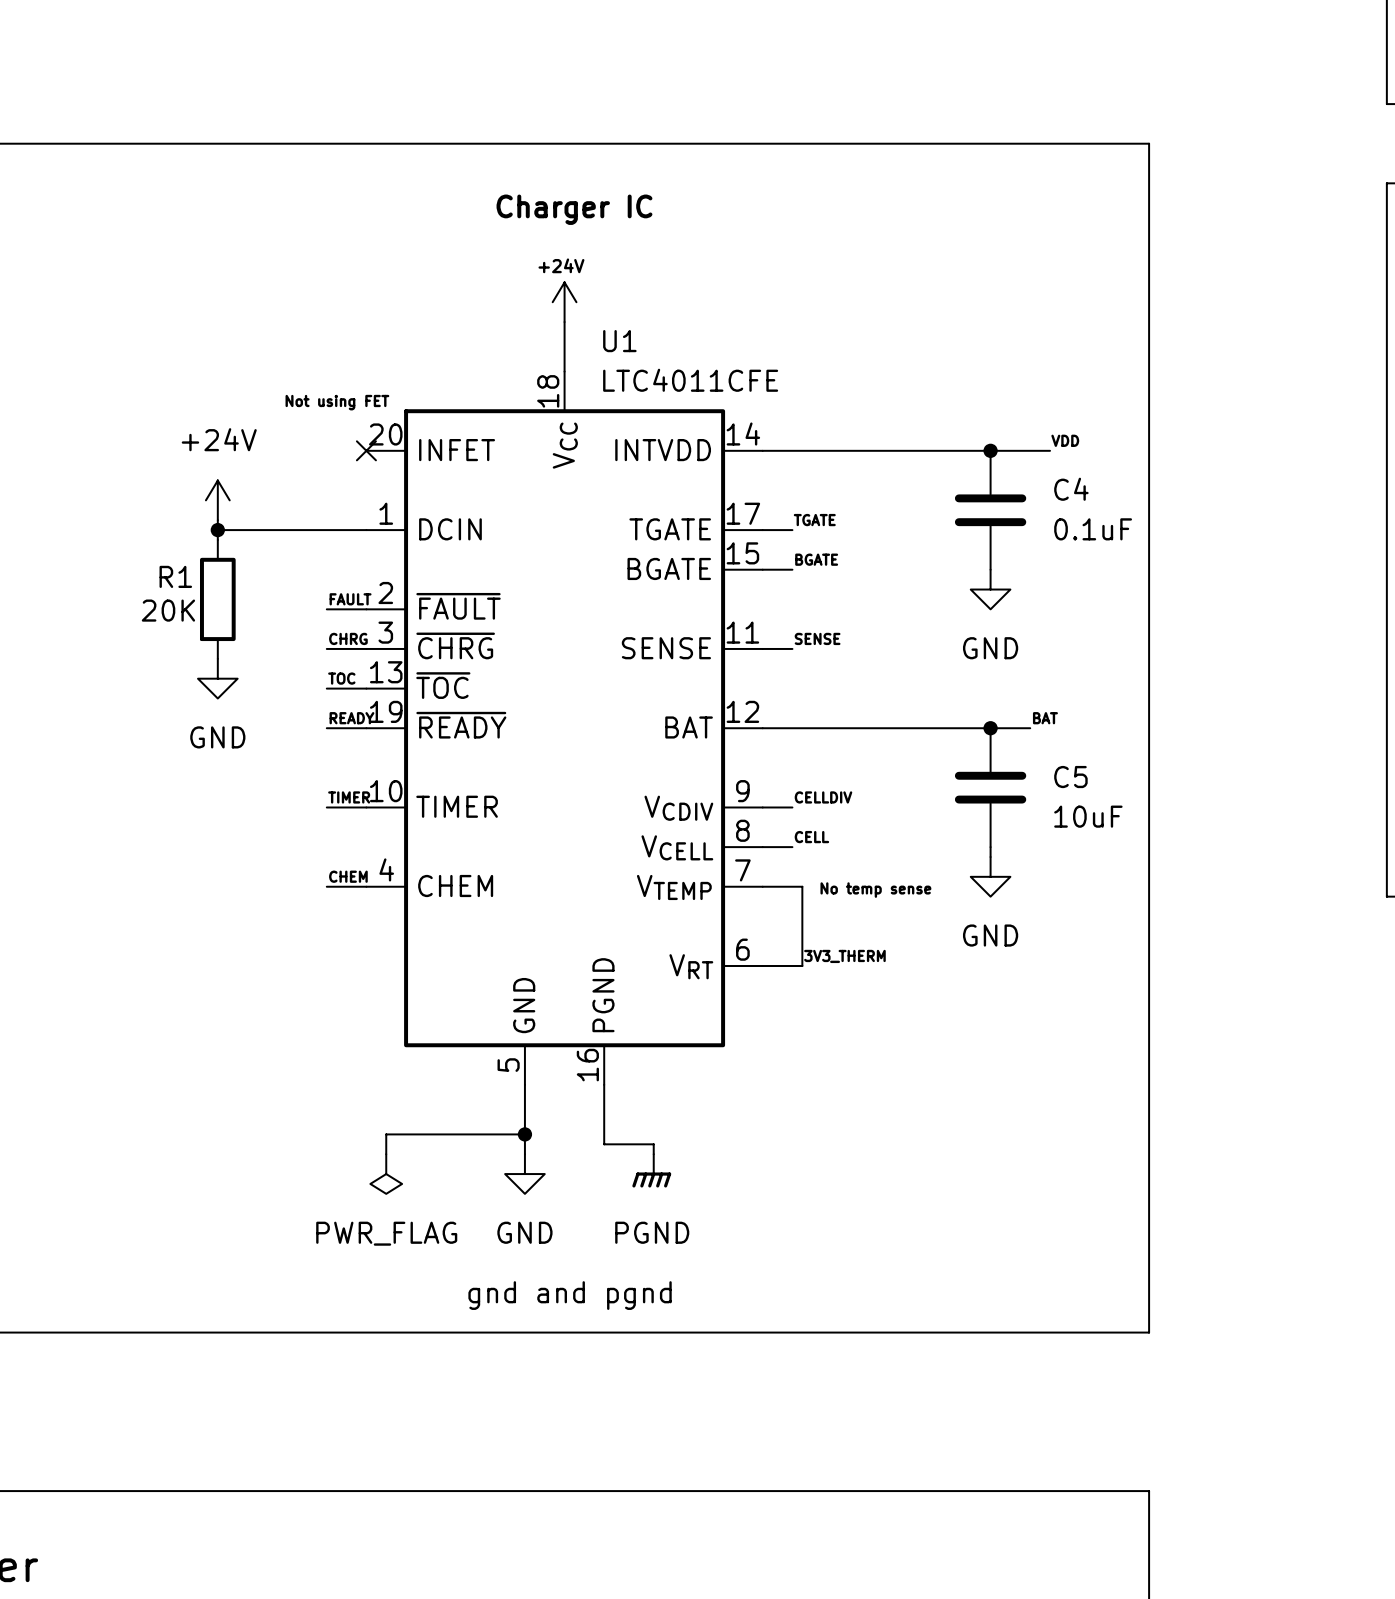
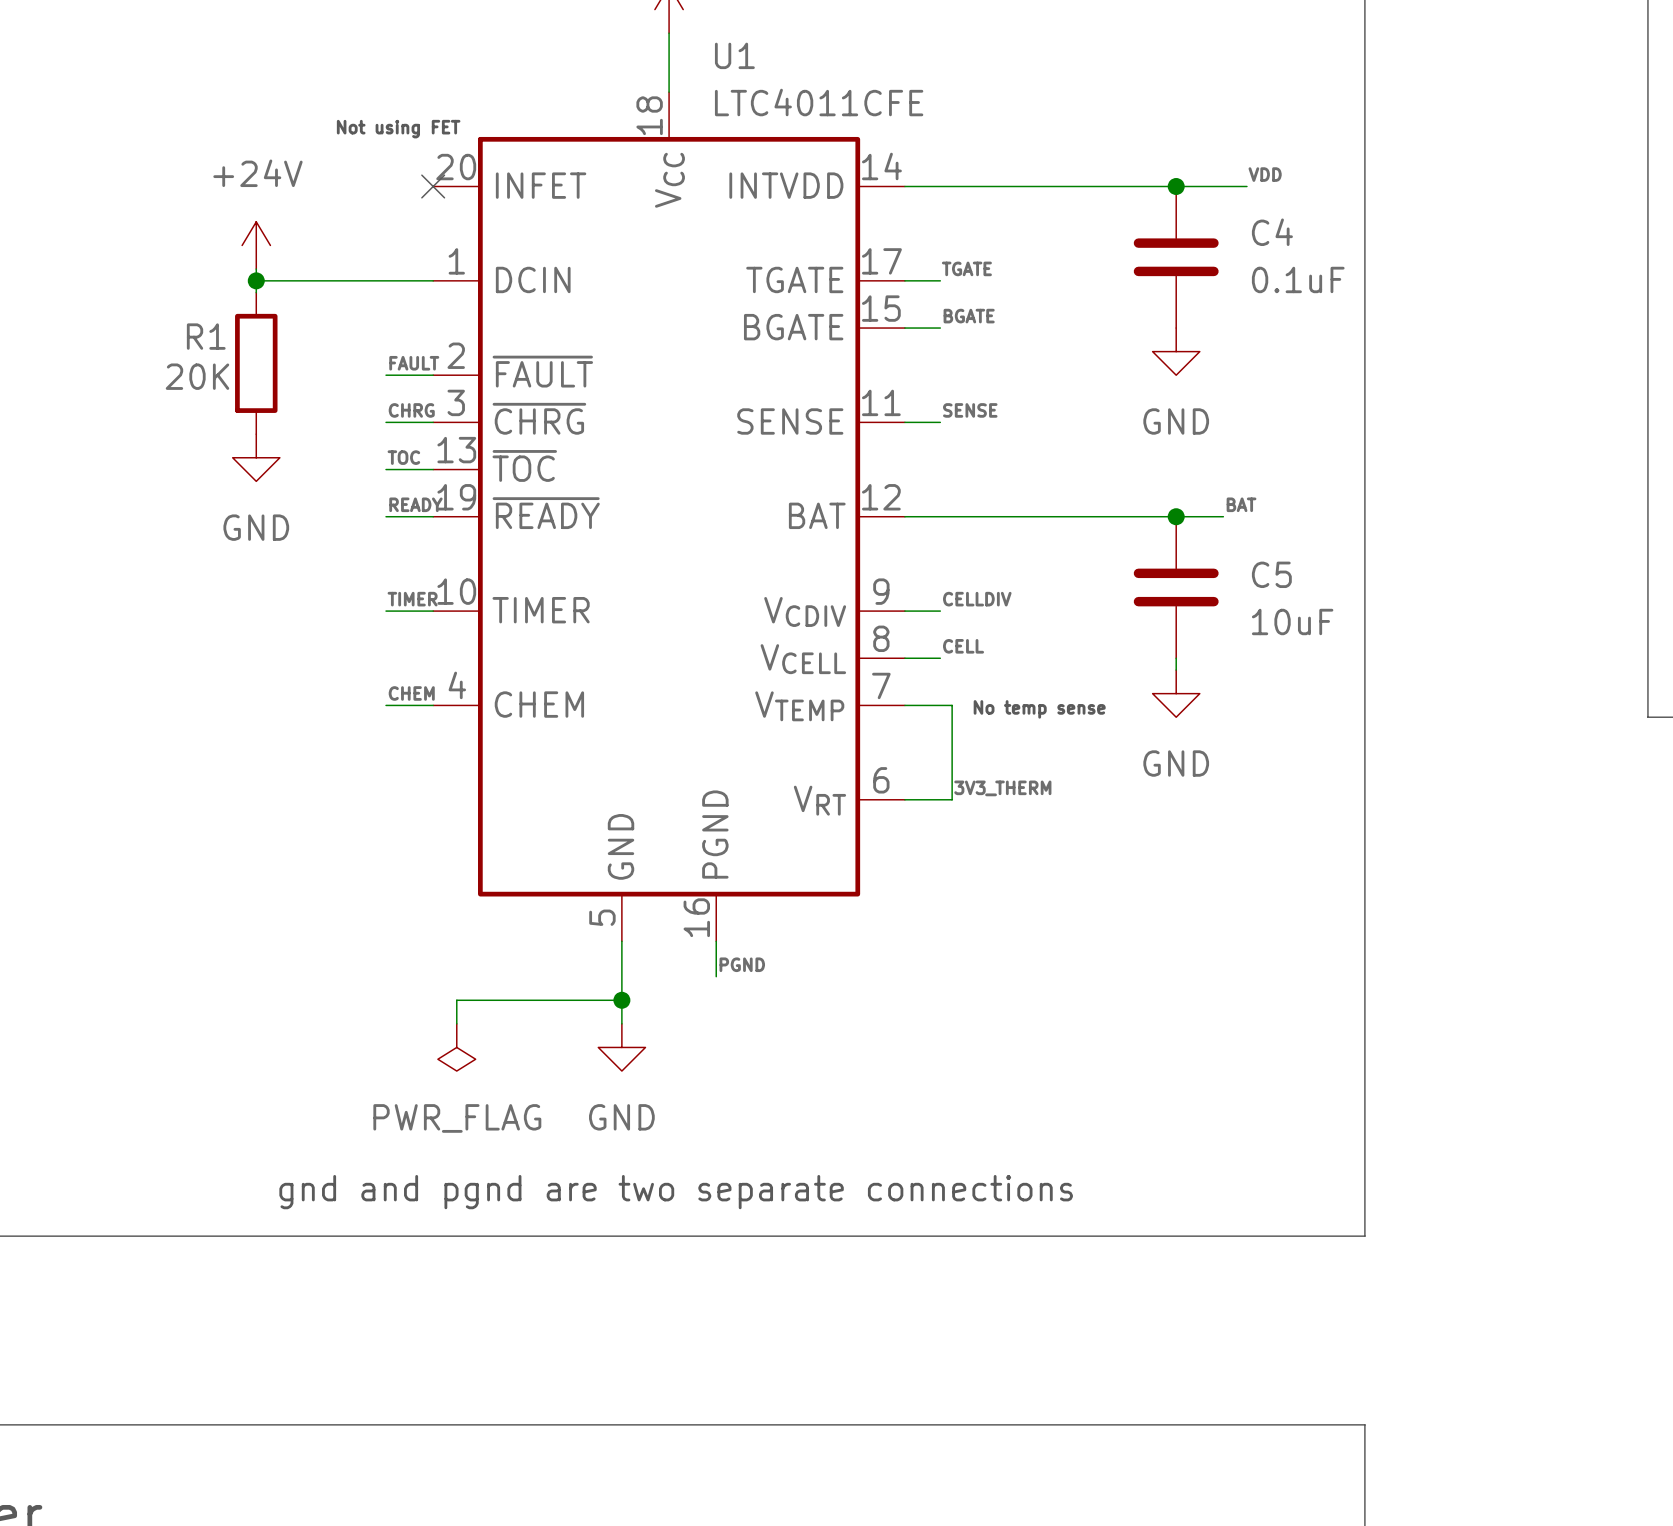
label: none -> PGND (742, 964)
wire: (604, 1114) (604, 1144) (653, 1144) (653, 1154) -> none
power symbol: PGND (651, 1170) -> none
text: gnd and pgnd (570, 1295) -> gnd and pgnd are two separate connections (676, 1192)

